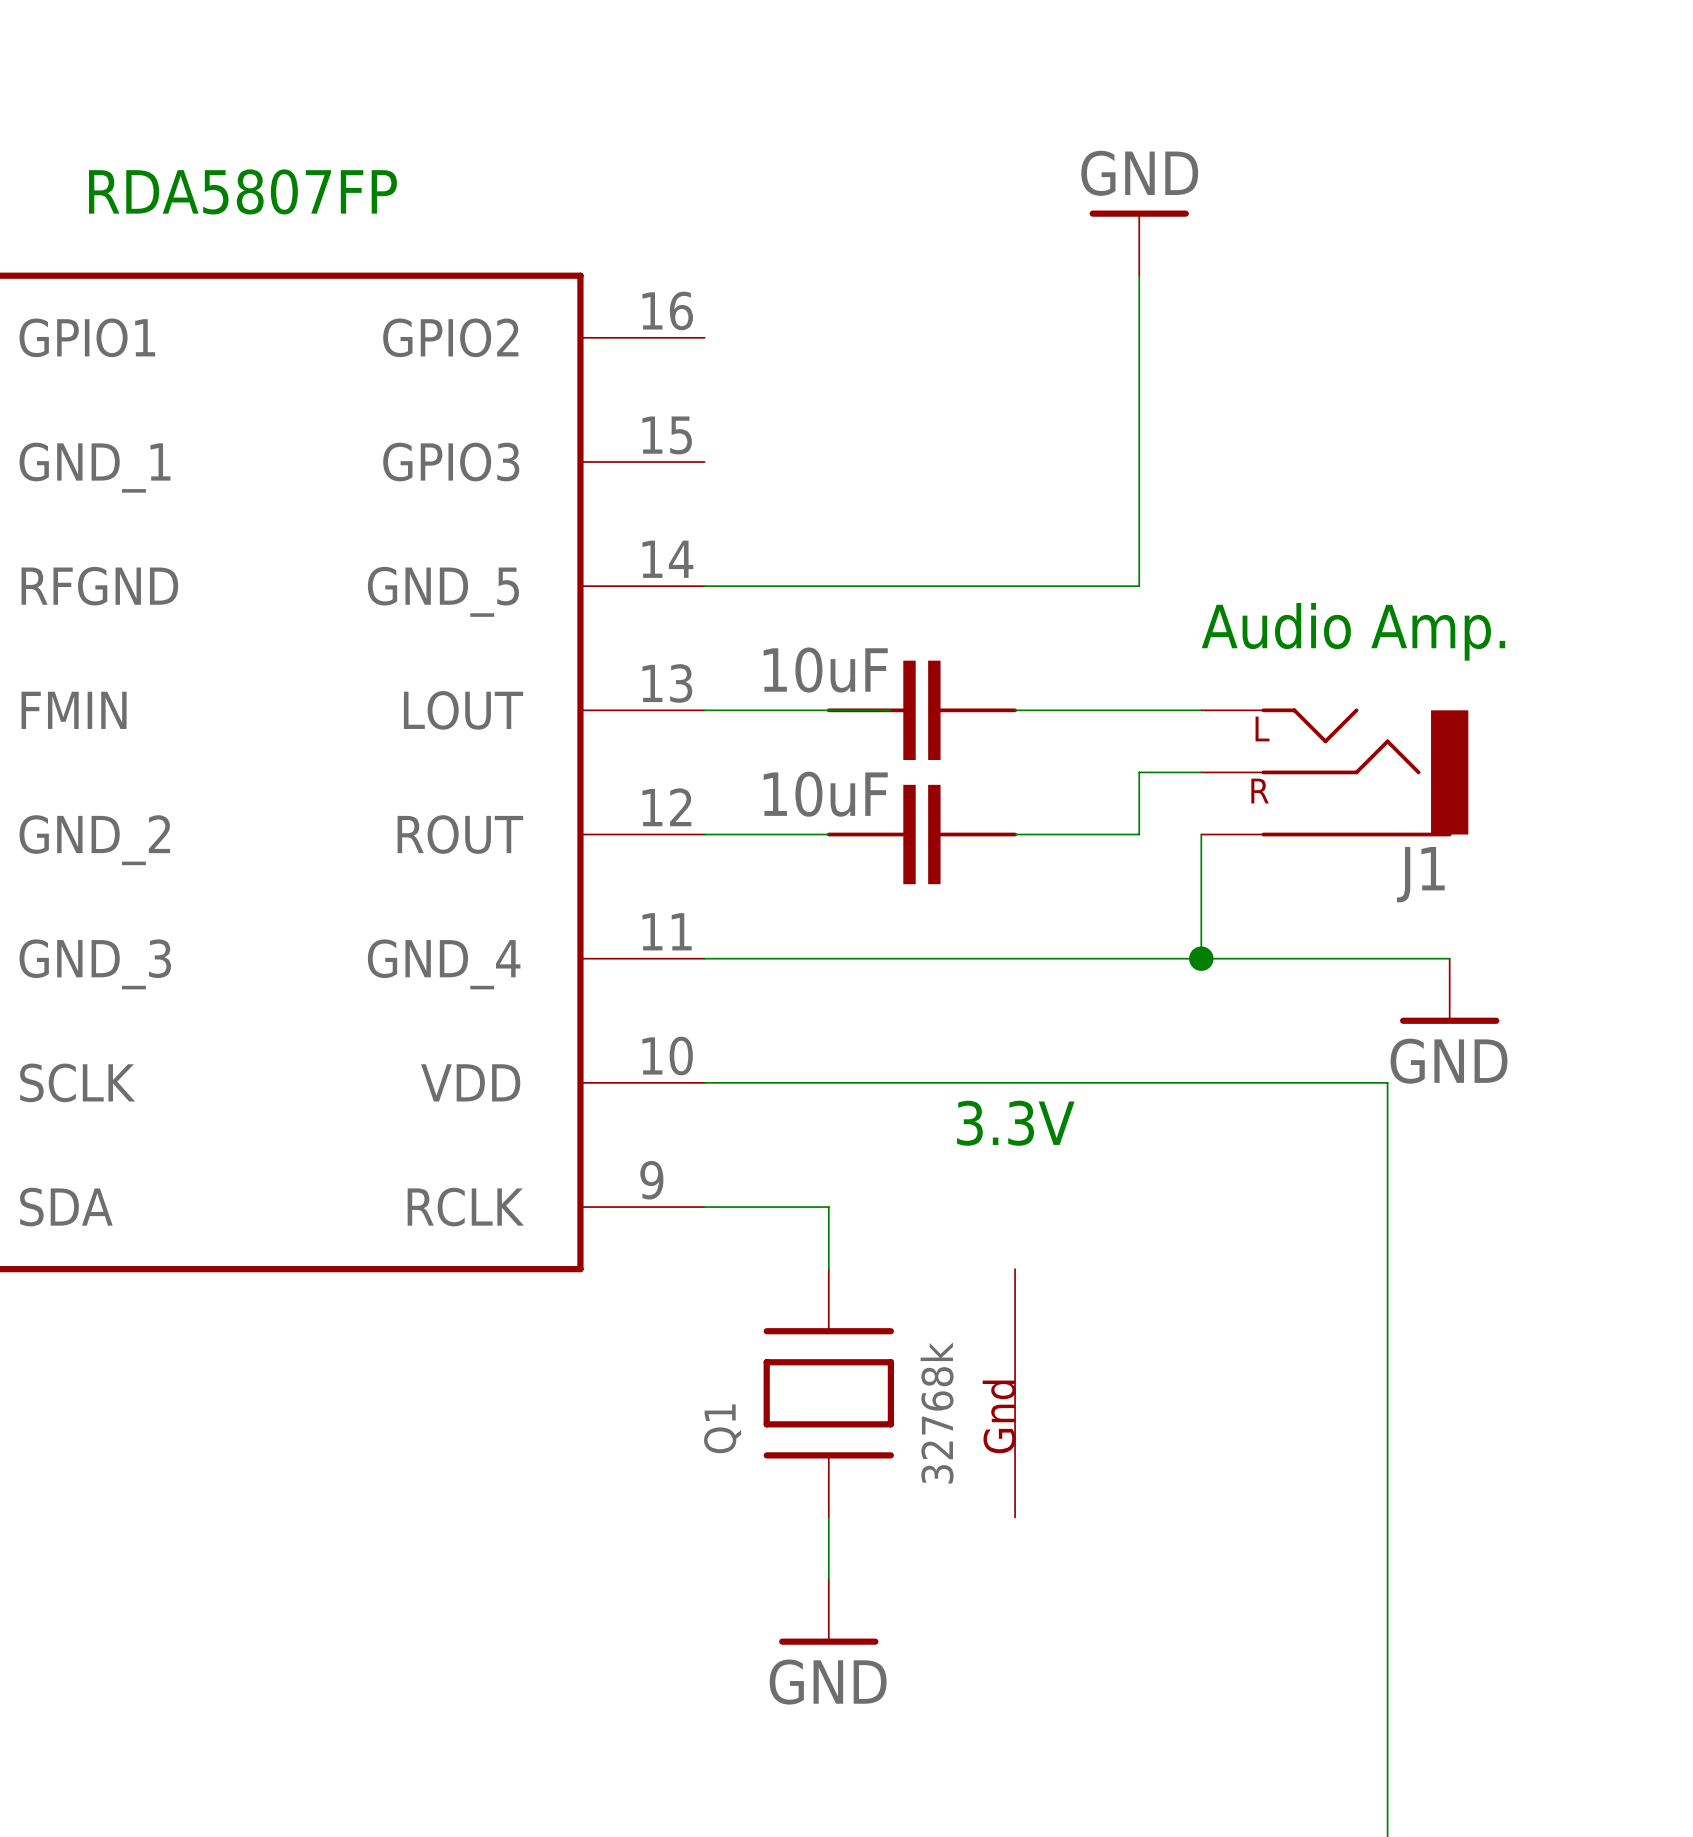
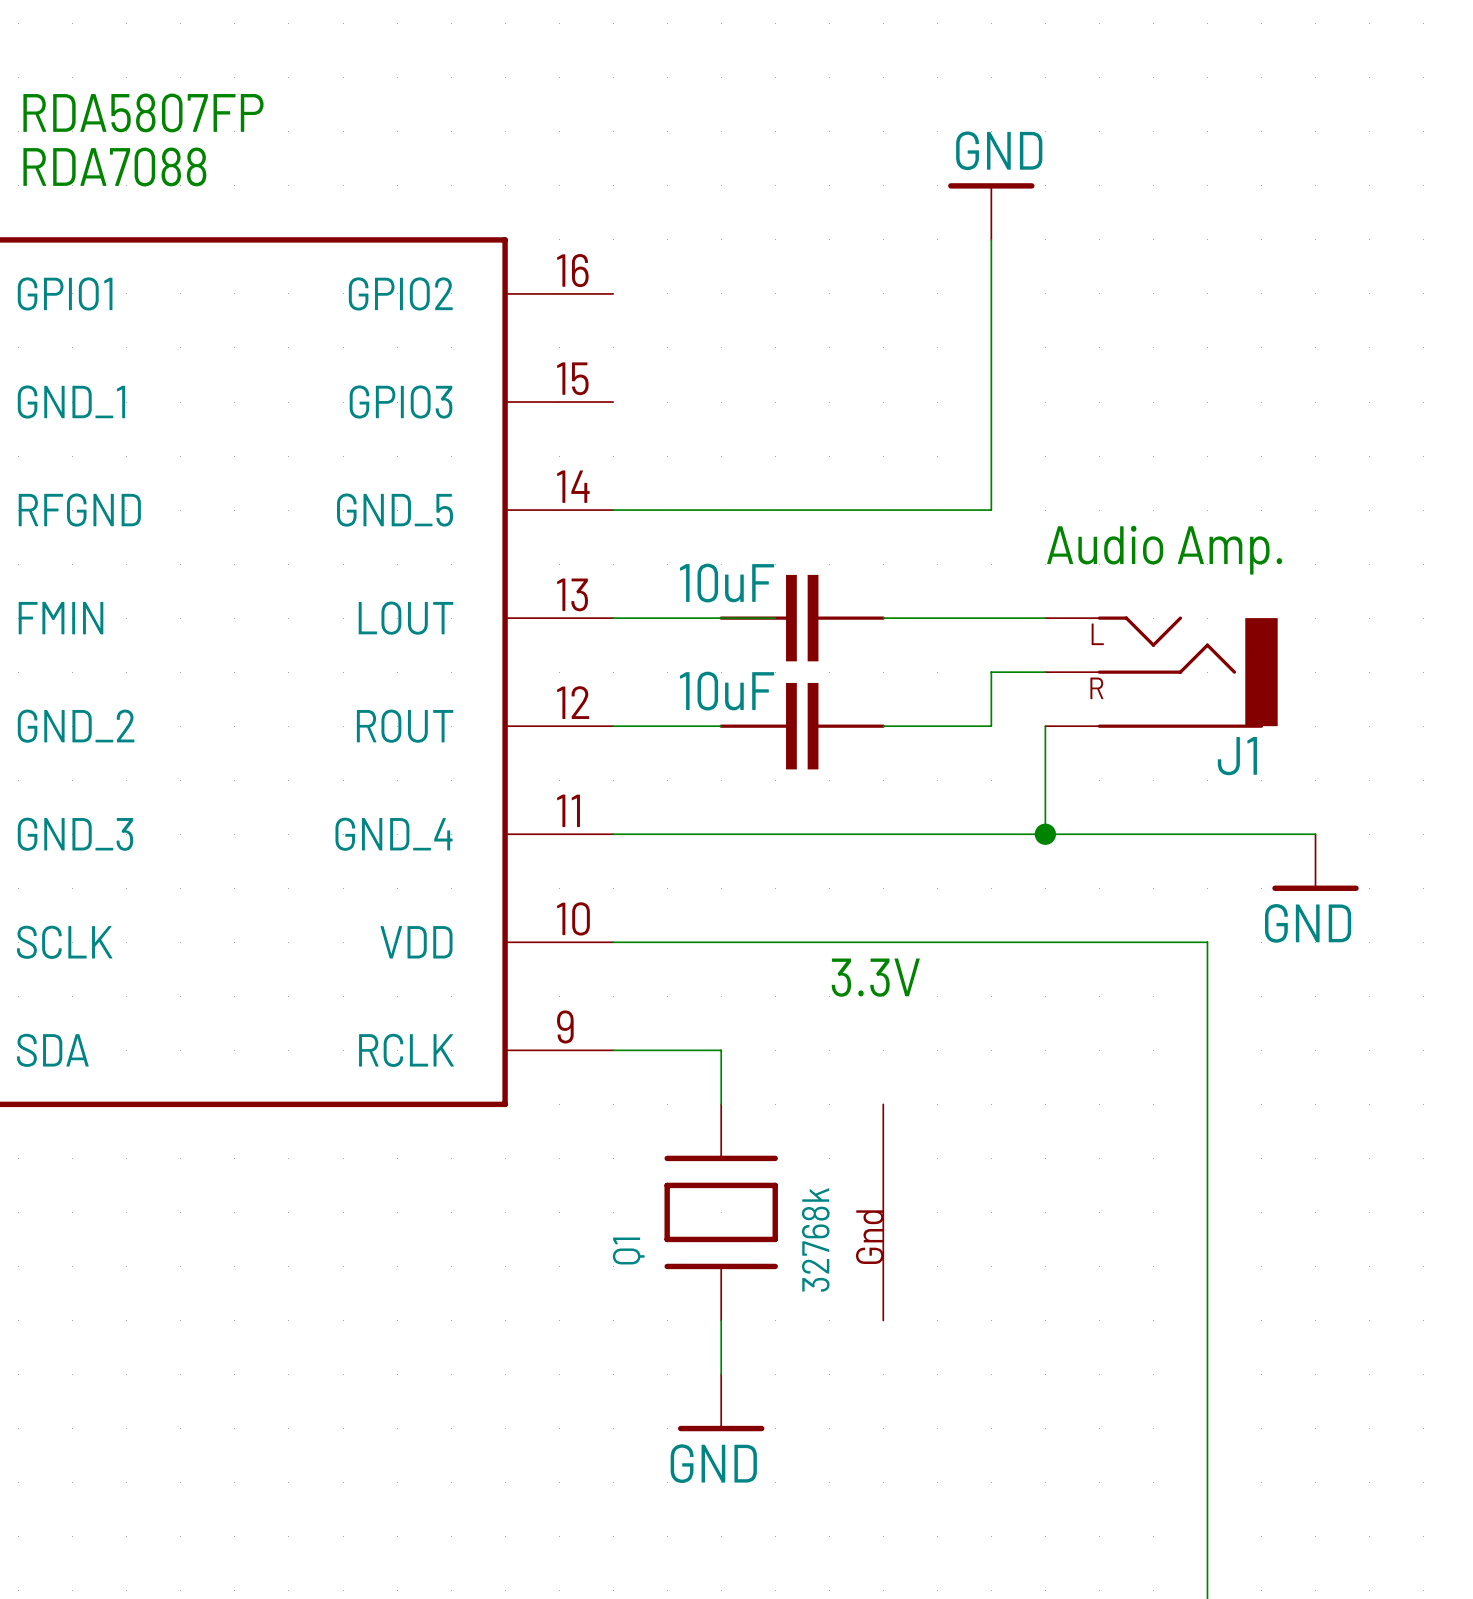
text: none -> RDA7088 (114, 166)
text position: RDA5807FP (242, 191) -> RDA5807FP (143, 112)
wire: none -> (1261, 834) (1315, 834)
power symbol position: GND (1449, 991) -> GND (1315, 862)

